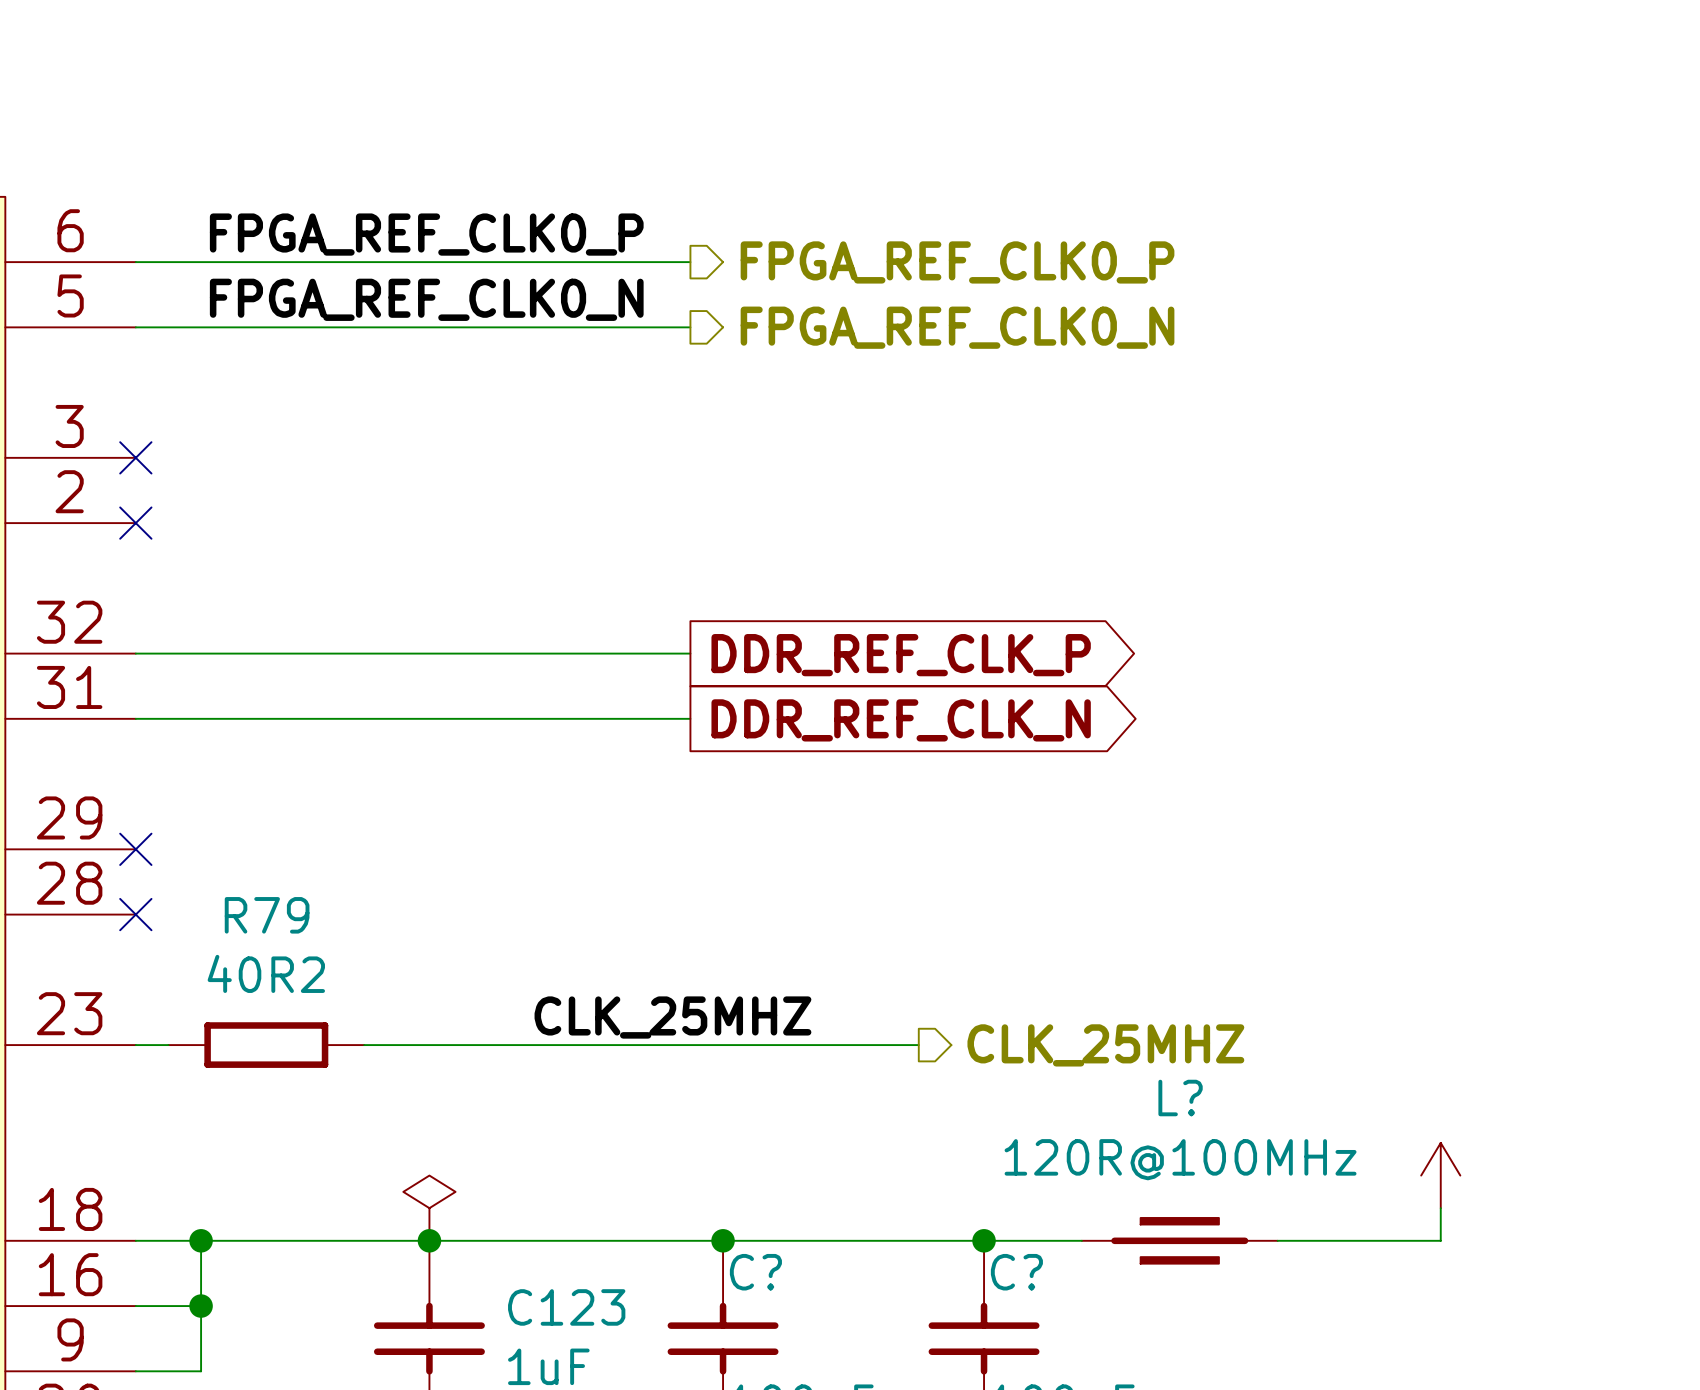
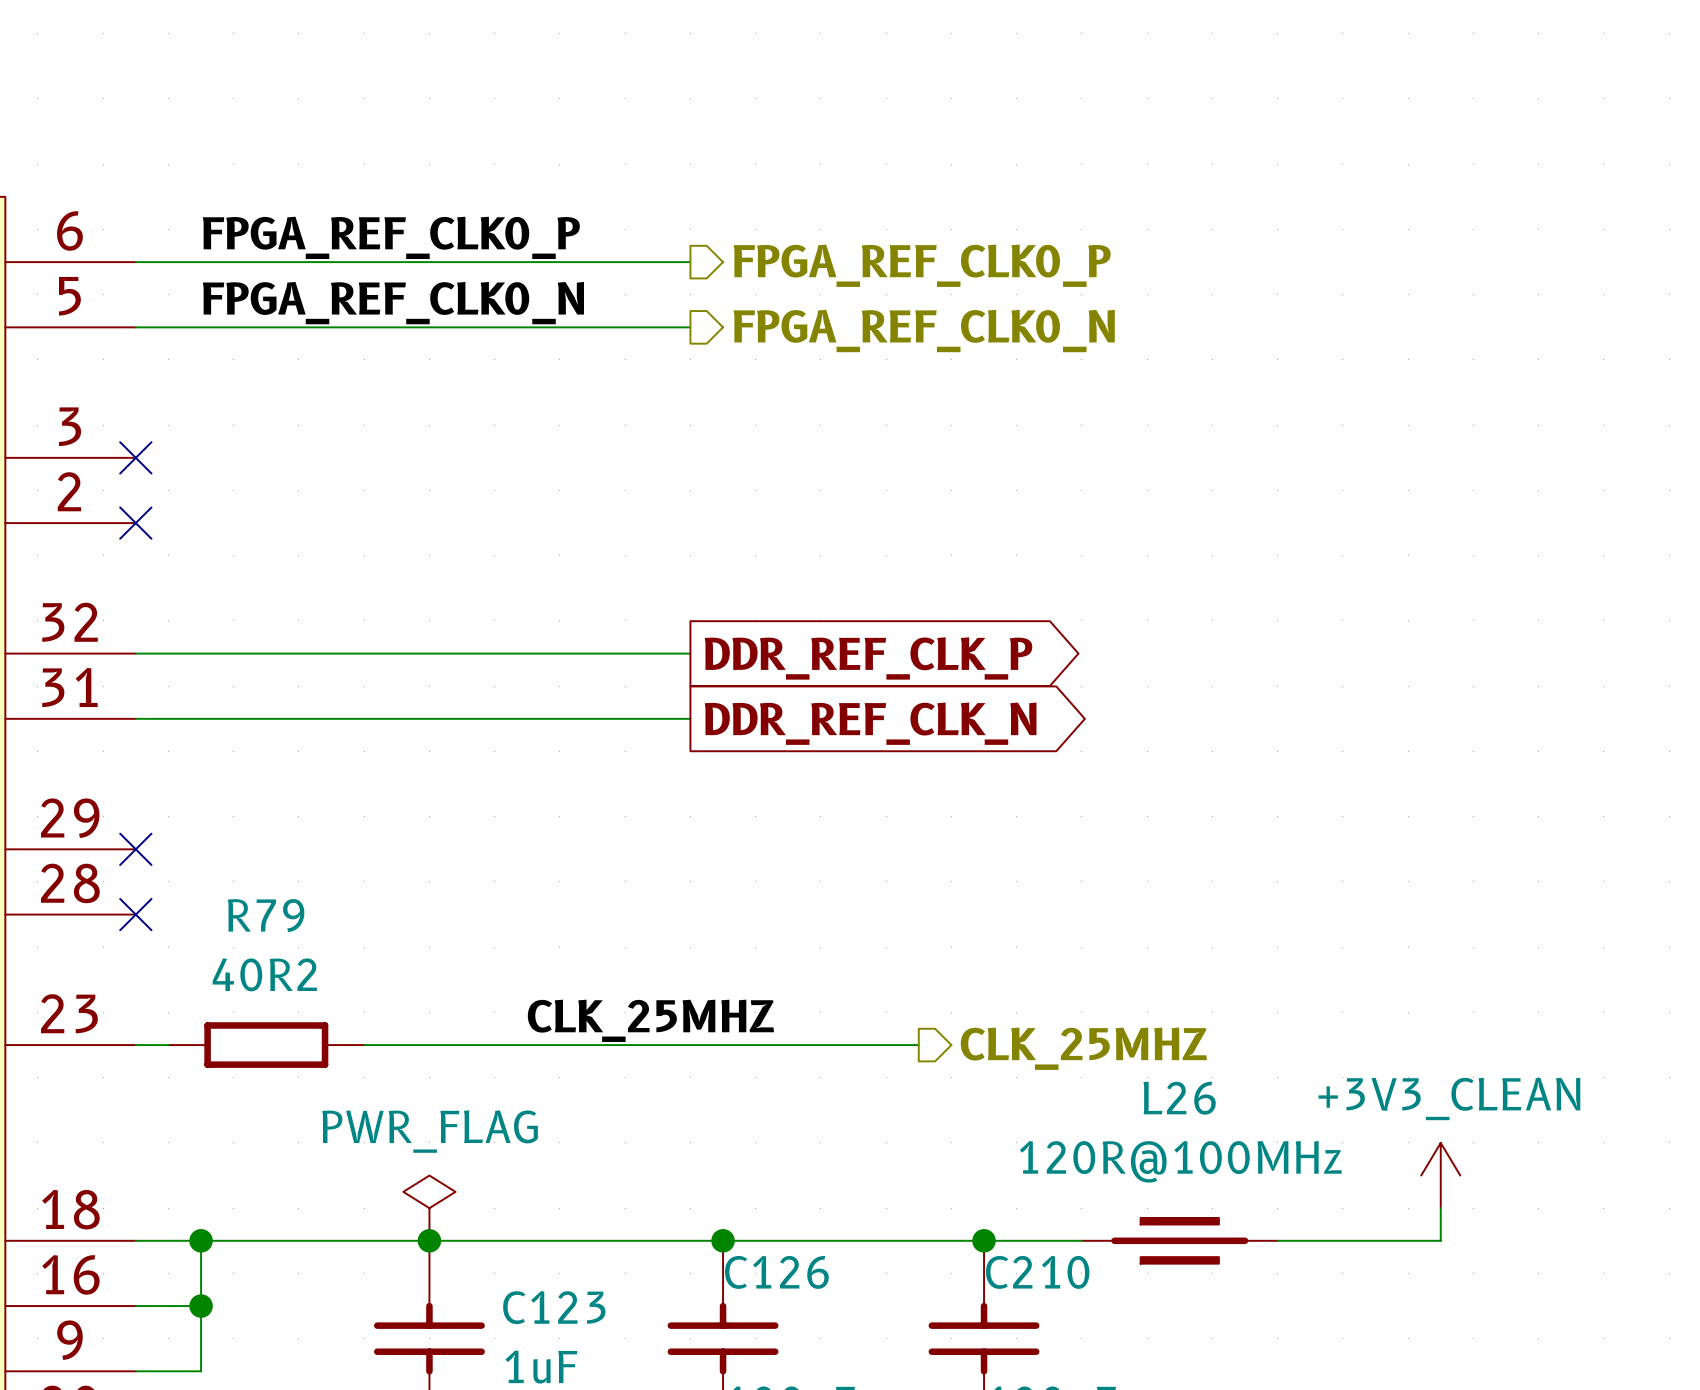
power symbol text: none -> +3V3_CLEAN (1449, 1098)
L? name: L? (1180, 1098) -> L26 (1179, 1098)
power symbol text: none -> PWR_FLAG (430, 1131)
C? name: C? (755, 1272) -> C126 (776, 1272)
C? name: C? (1016, 1272) -> C210 (1037, 1272)

